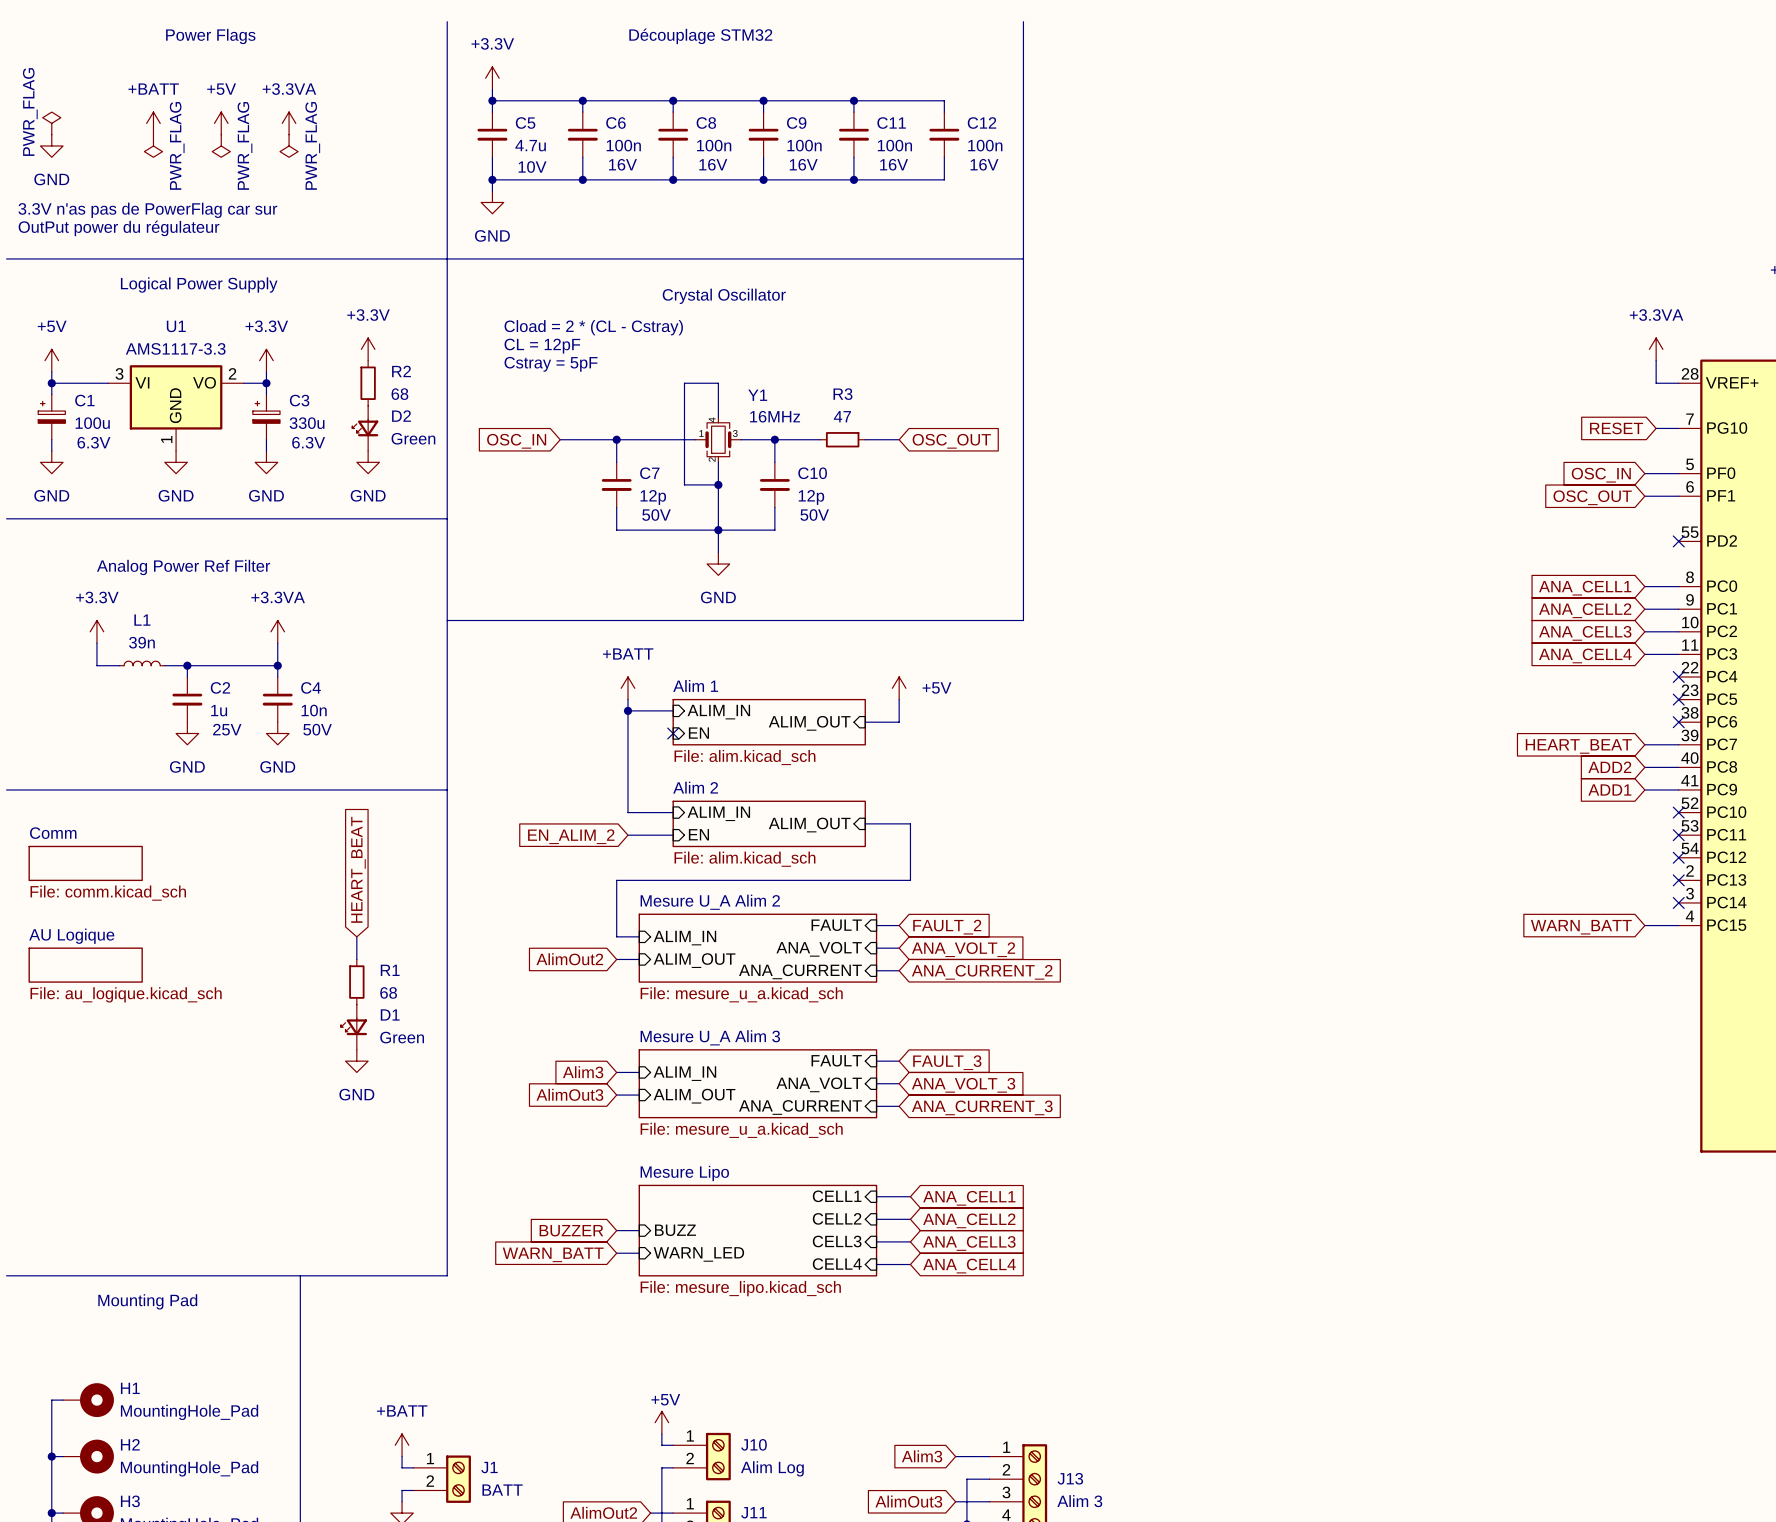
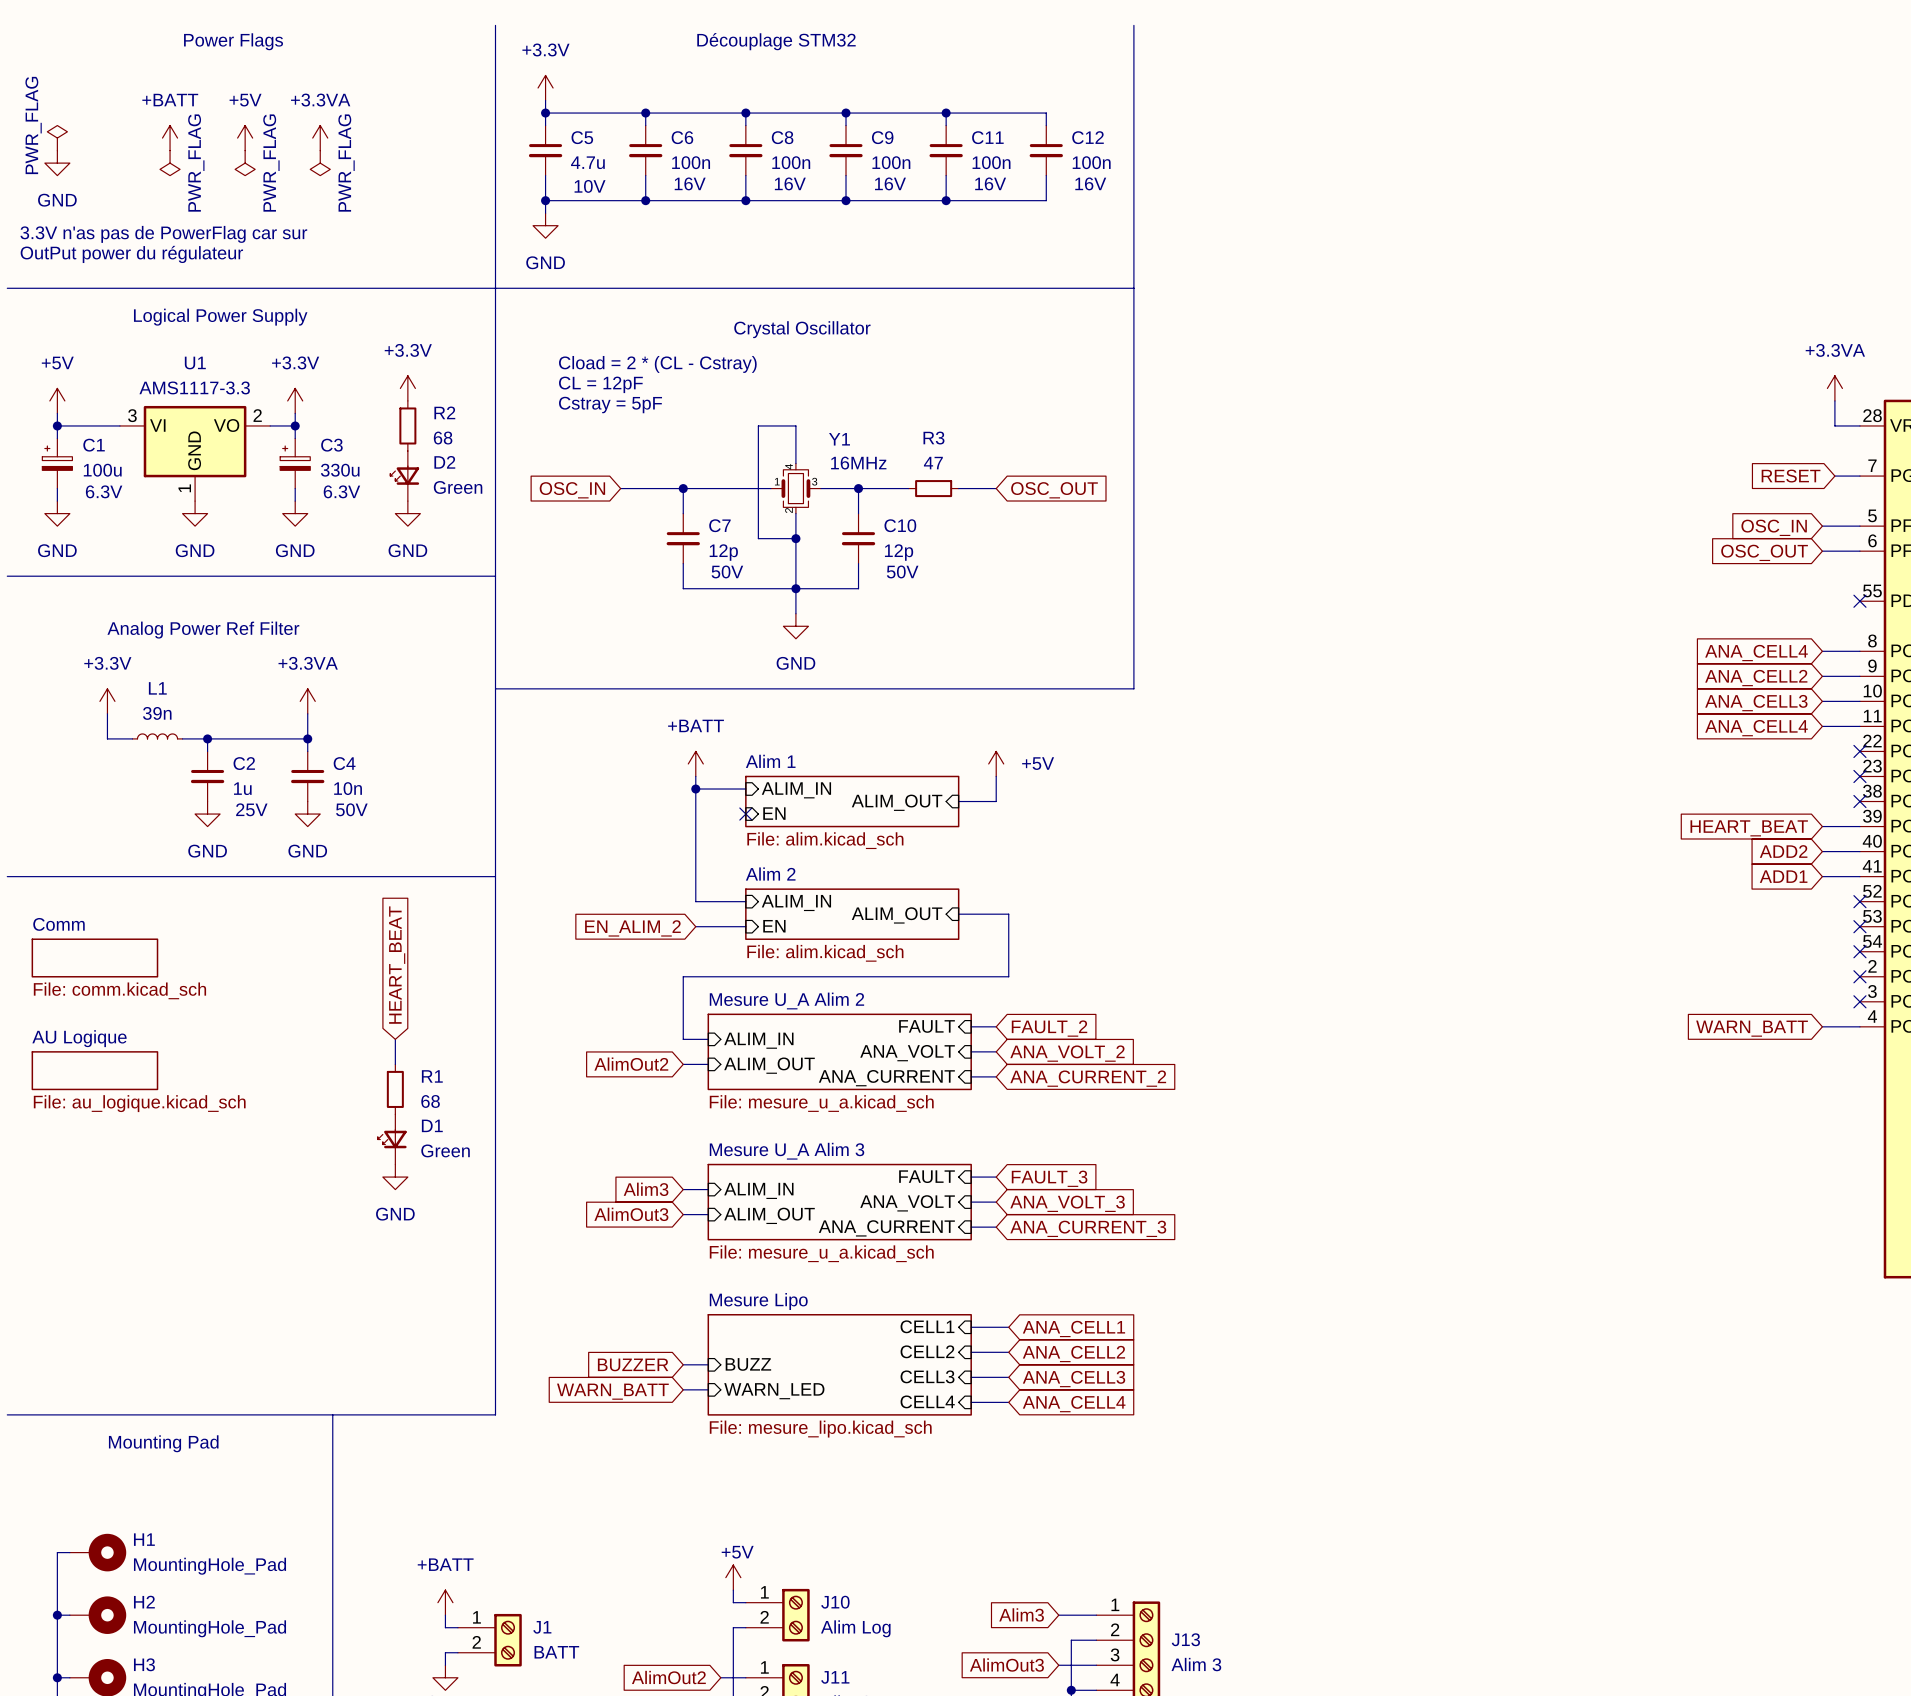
global label: ANA_CELL1 (1585, 588) -> ANA_CELL4 (1756, 653)

